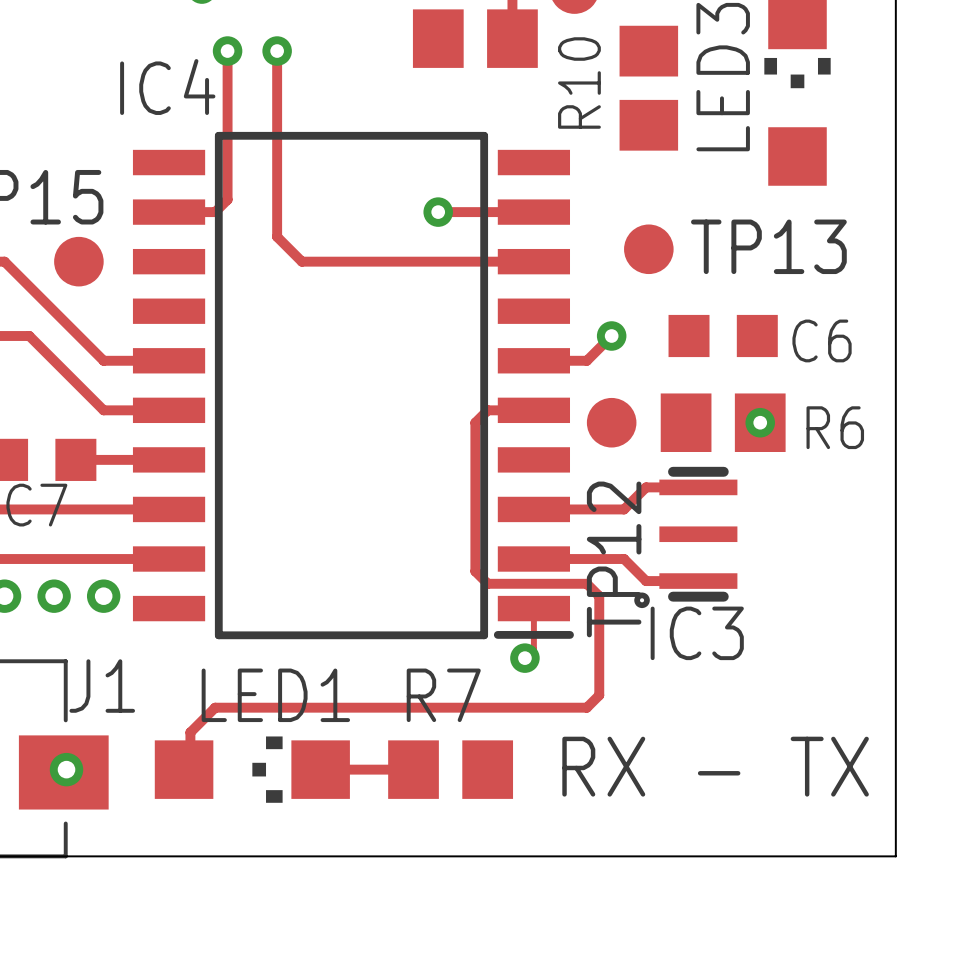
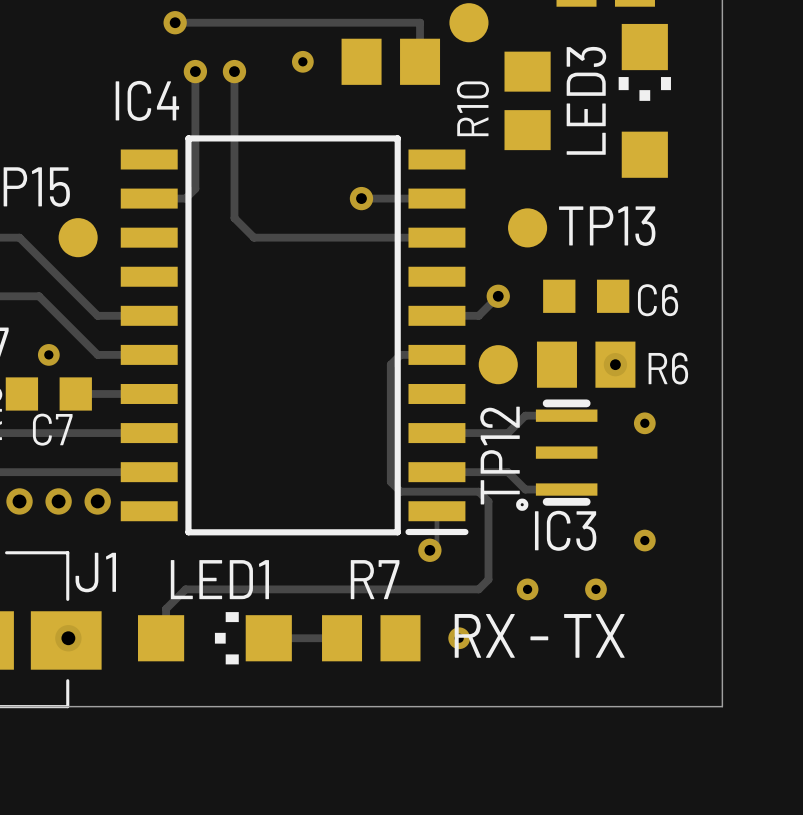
via: none -> (302, 61)
via: none -> (48, 354)
via: none -> (644, 423)
via: none -> (644, 540)
via: none -> (527, 589)
via: none -> (595, 589)
via: none -> (459, 638)

